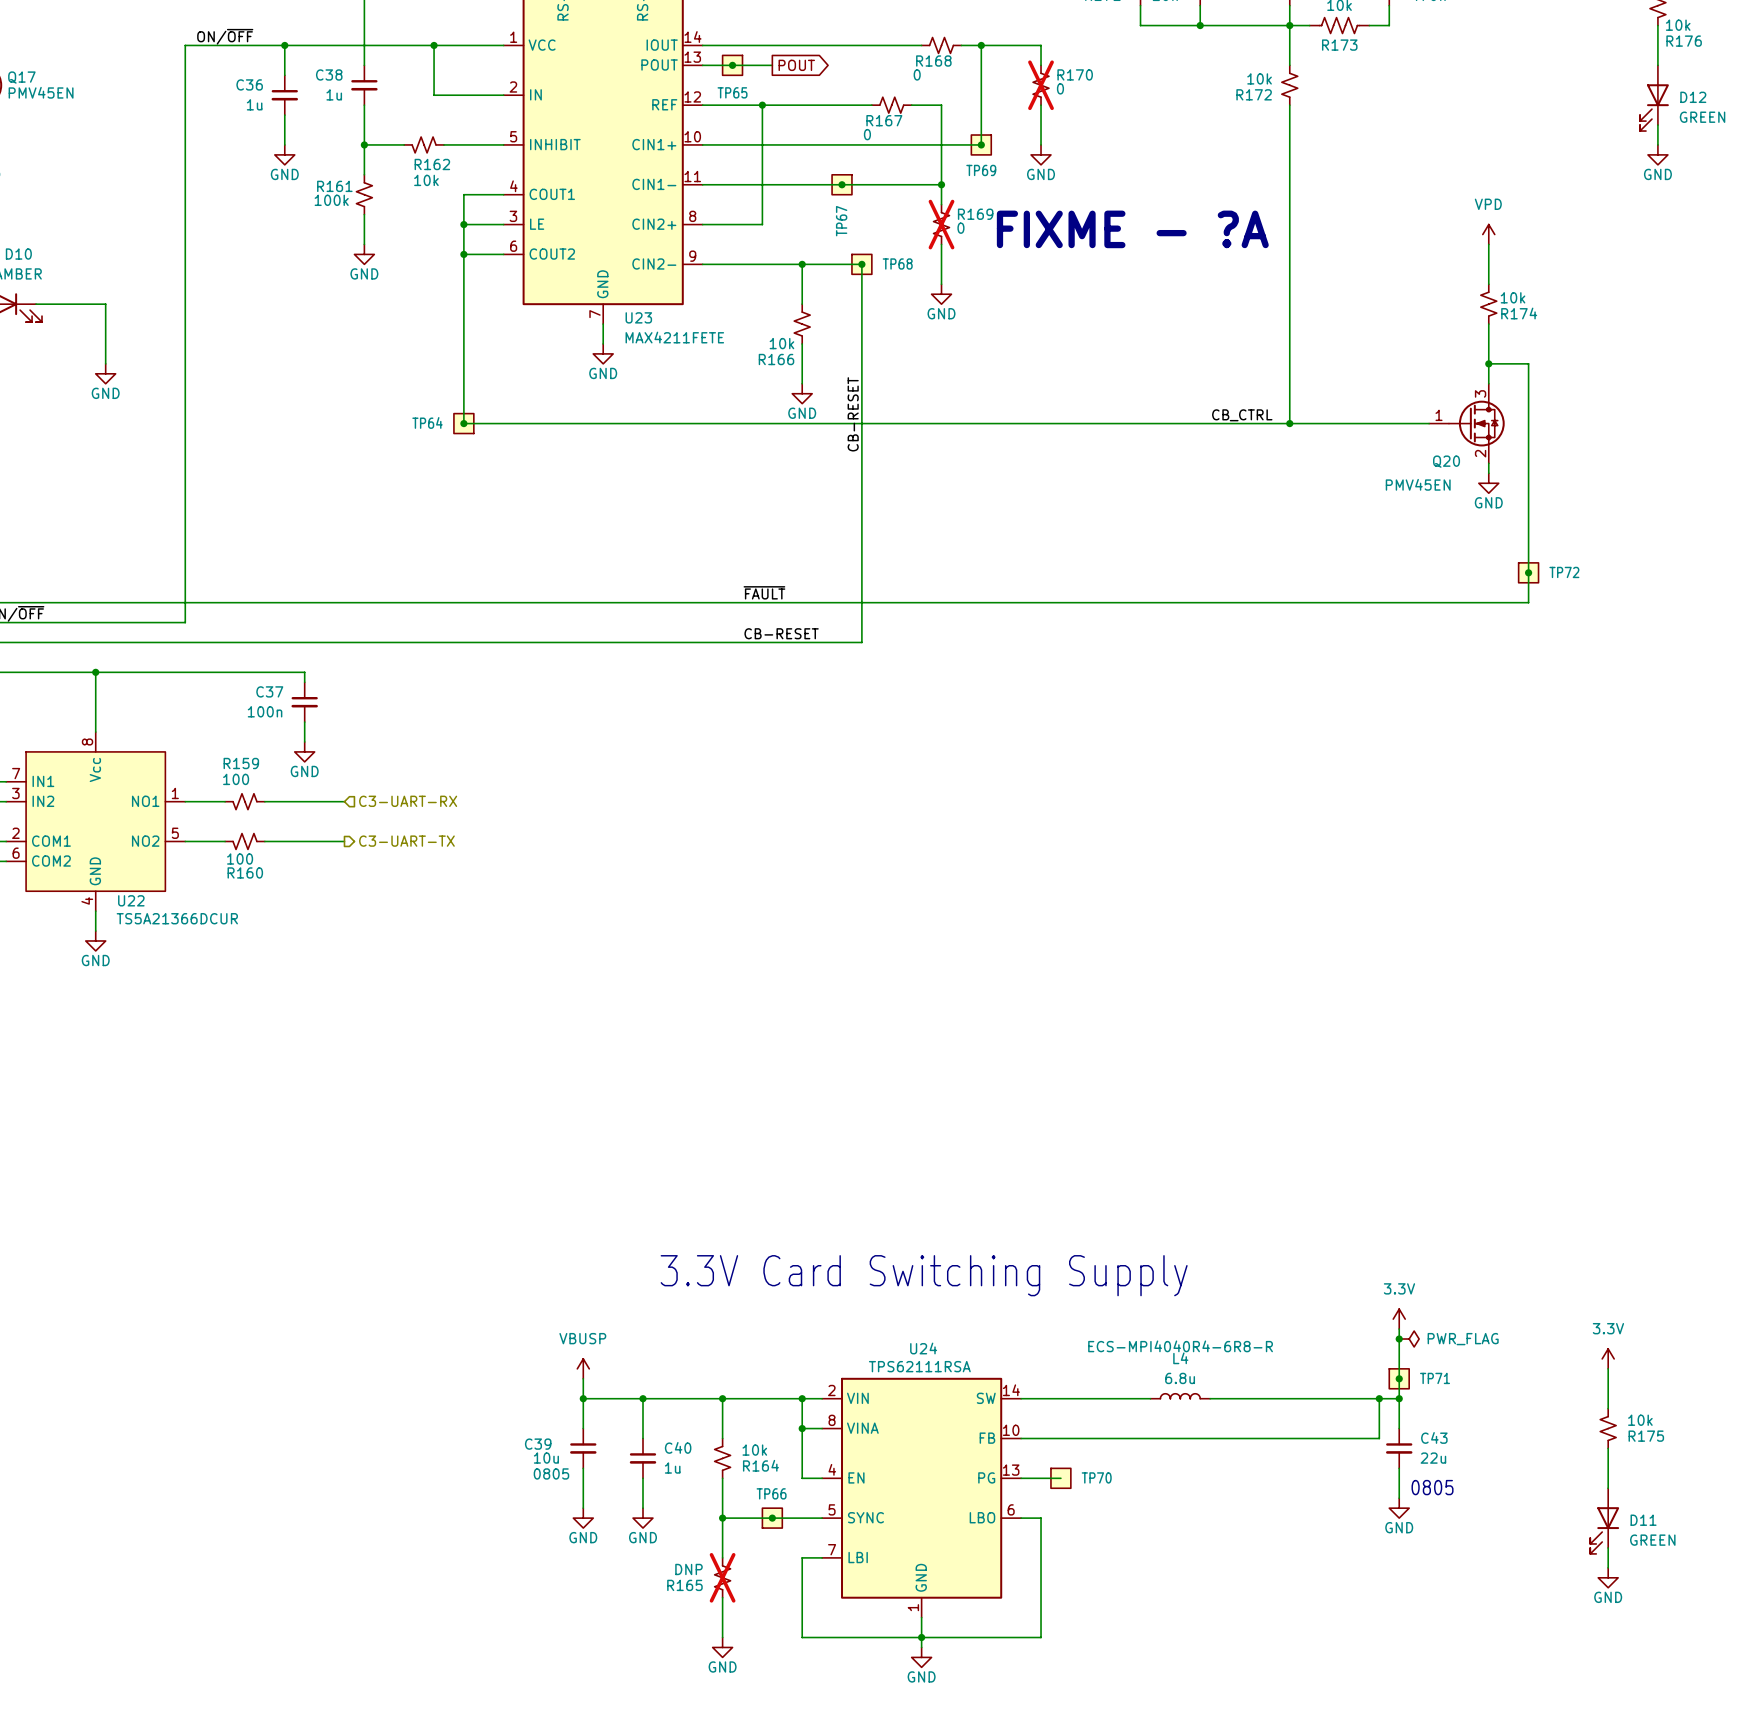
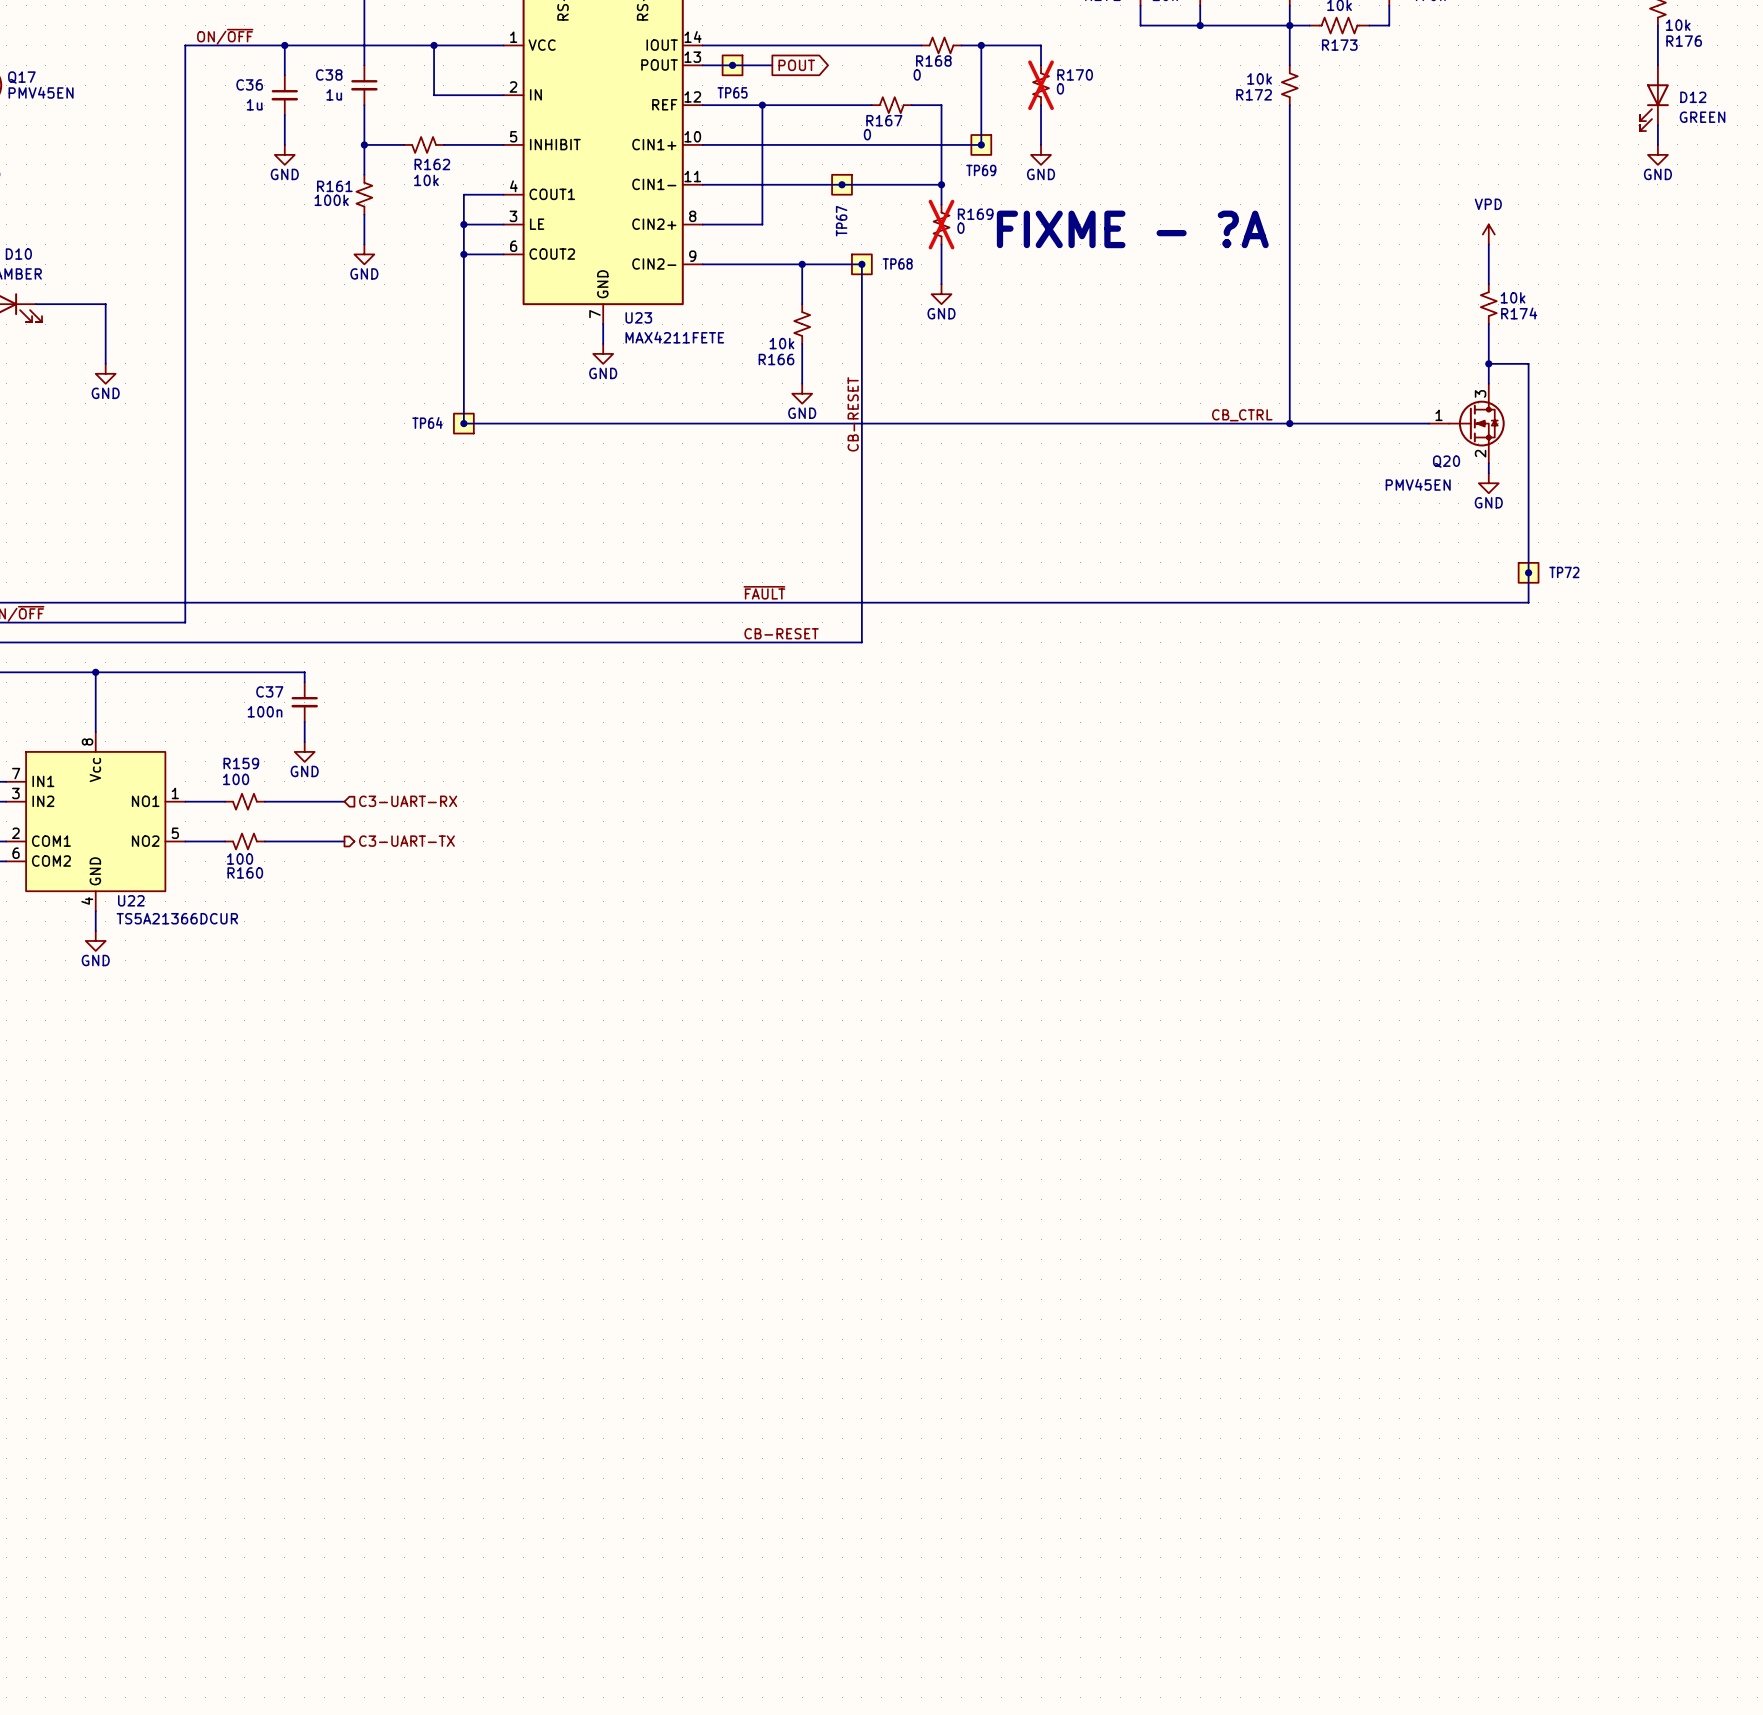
text: 3.3V Card Switching Supply (924, 1275) -> none
power symbol: 3.3V (1399, 1319) -> none
wire: (1399, 1329) (1399, 1428) -> none
junction: (1399, 1339) -> none
power symbol: PWR_FLAG (1409, 1339) -> none
power symbol: 3.3V (1608, 1358) -> none
power symbol: VBUSP (583, 1368) -> none
wire: (1608, 1368) (1608, 1408) -> none
wire: (583, 1378) (583, 1428) -> none
junction: (1399, 1378) -> none
TP71: (1399, 1378) -> none
L4: 6.8u (1180, 1396) -> none
wire: (583, 1398) (822, 1398) -> none
junction: (583, 1398) -> none
wire: (643, 1398) (643, 1438) -> none
junction: (643, 1398) -> none
wire: (722, 1398) (722, 1438) -> none
junction: (722, 1398) -> none
wire: (802, 1398) (802, 1478) (822, 1478) -> none
junction: (802, 1398) -> none
wire: (1021, 1398) (1150, 1398) -> none
wire: (1210, 1398) (1399, 1398) -> none
wire: (1379, 1398) (1379, 1438) (1021, 1438) -> none
junction: (1379, 1398) -> none
junction: (1399, 1398) -> none
wire: (802, 1428) (822, 1428) -> none
junction: (802, 1428) -> none
R175: 10k (1608, 1428) -> none
C39: 10u (583, 1448) -> none
C43: 22u (1399, 1448) -> none
wire: (1608, 1448) (1608, 1488) -> none
C40: 1u (643, 1458) -> none
R164: 10k (722, 1458) -> none
wire: (583, 1468) (583, 1508) -> none
wire: (1399, 1468) (1399, 1498) -> none
wire: (643, 1478) (643, 1508) -> none
wire: (722, 1478) (722, 1557) -> none
wire: (1021, 1478) (1060, 1478) -> none
TP70: (1060, 1478) -> none
text: 0805 (1432, 1487) -> none
U24: TPS62111RSA (921, 1497) -> none
power symbol: GND (1399, 1508) -> none
power symbol: GND (583, 1518) -> none
power symbol: GND (643, 1518) -> none
wire: (722, 1518) (822, 1518) -> none
junction: (722, 1518) -> none
junction: (772, 1518) -> none
TP66: (772, 1518) -> none
wire: (1021, 1518) (1041, 1518) (1041, 1637) (802, 1637) (802, 1557) (822, 1557) -> none
D11: GREEN (1604, 1521) -> none
wire: (1608, 1547) (1608, 1567) -> none
R165: DNP (722, 1577) -> none
power symbol: GND (1608, 1577) -> none
wire: (722, 1597) (722, 1637) -> none
wire: (921, 1617) (921, 1647) -> none
junction: (921, 1637) -> none
power symbol: GND (722, 1647) -> none
power symbol: GND (921, 1657) -> none

